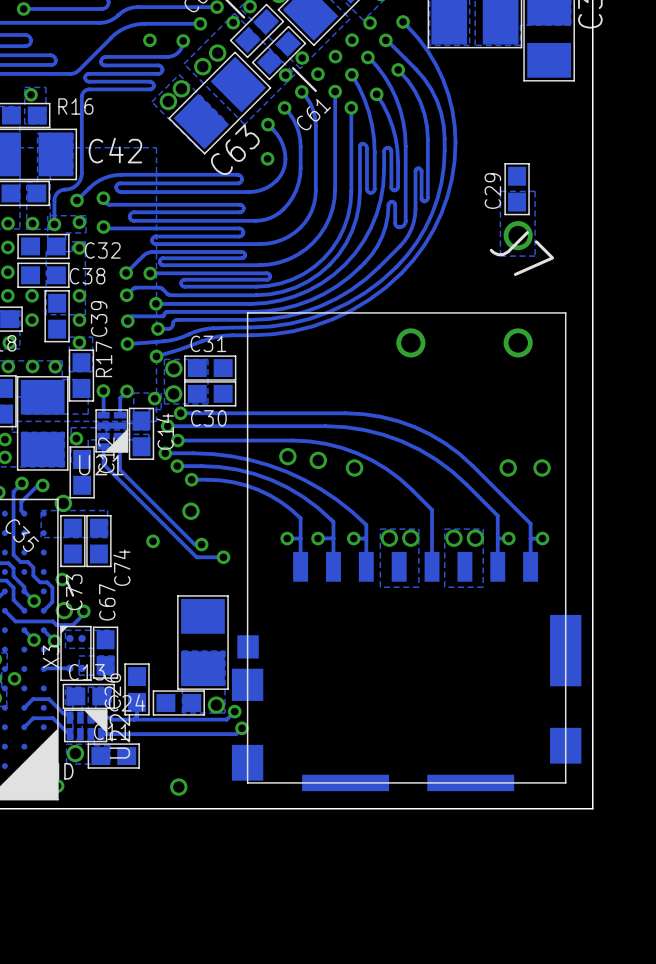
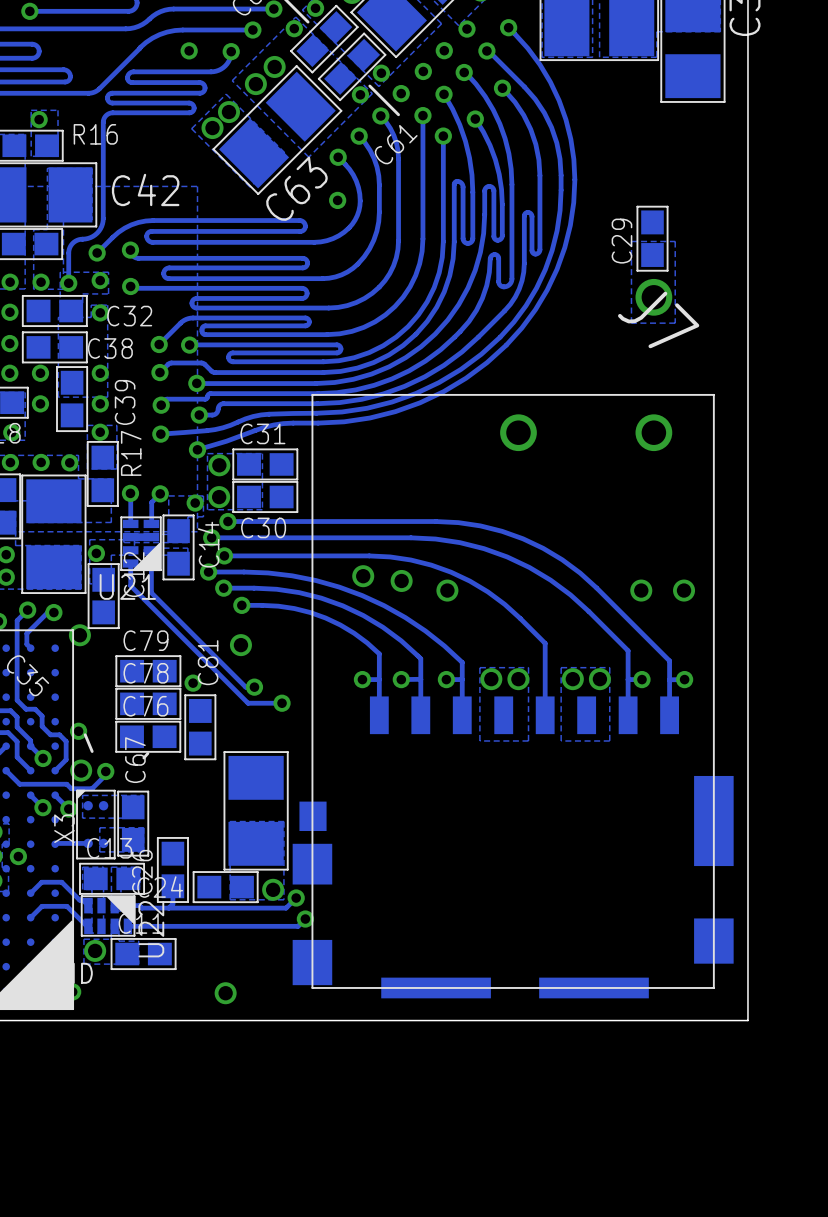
zone outline: (107, 510) (107, 537) (41, 537) (41, 510) (107, 510) -> none
C79: none -> (148, 671)
C73: (72, 541) -> none
C74: (98, 541) -> none
C78: none -> (148, 703)
C81: none -> (200, 727)
C76: none -> (148, 736)
line: none -> (147, 753) (143, 757)

